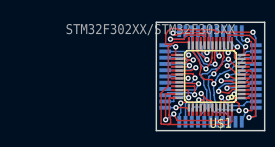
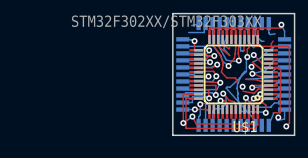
bottom track: (210, 31) (209, 52) (206, 52) -> none
bottom track: (235, 31) (236, 39) (245, 46) -> none
top track: (208, 32) (185, 32) (175, 35) (173, 33) -> none
top track: (252, 32) (171, 28) (165, 34) (165, 44) (171, 44) -> none
via: (173, 33) -> none
top track: (170, 39) (183, 39) (186, 34) (204, 35) (204, 42) -> none
via: (170, 39) -> none
top track: (247, 40) (251, 41) (252, 62) (244, 62) -> none
via: (247, 40) -> none
top track: (188, 42) (174, 42) (171, 44) -> (209, 36) (209, 28) (281, 28)
top track: (224, 42) (222, 64) (213, 73) -> (249, 36) (247, 57)
top track: (228, 42) (227, 34) (249, 35) (255, 40) (255, 116) (249, 117) -> (253, 36) (254, 46) (289, 47) (289, 123) (286, 126)
top track: (171, 44) (168, 47) (168, 85) (161, 93) (161, 123) (170, 122) (169, 97) -> (185, 128) (187, 98)
top track: (237, 46) (234, 49) (234, 57) (244, 58) -> none
via: (237, 46) -> none
via: (245, 46) -> none
via: (206, 52) -> none
via: (228, 52) -> none
via: (219, 56) -> none
bottom track: (255, 57) (244, 57) (237, 66) (220, 73) -> none
via: (206, 59) -> none
bottom track: (228, 59) (222, 61) (218, 67) (201, 74) (206, 89) (206, 108) (198, 117) (198, 121) -> none
via: none -> (247, 57)
via: (227, 65) -> none
via: none -> (251, 66)
bottom track: (213, 73) (208, 77) (210, 106) (214, 112) (225, 112) -> (247, 57) (246, 71) (230, 87) (226, 88) (250, 115)
via: (213, 73) -> none
bottom track: (255, 76) (250, 76) (245, 82) (225, 83) (219, 87) (218, 91) -> none
via: (221, 80) -> none
via: (213, 83) -> none
via: none -> (242, 86)
via: (218, 91) -> none
via: (245, 110) -> none
via: none -> (278, 117)
via: (249, 117) -> none
via: none -> (286, 126)

